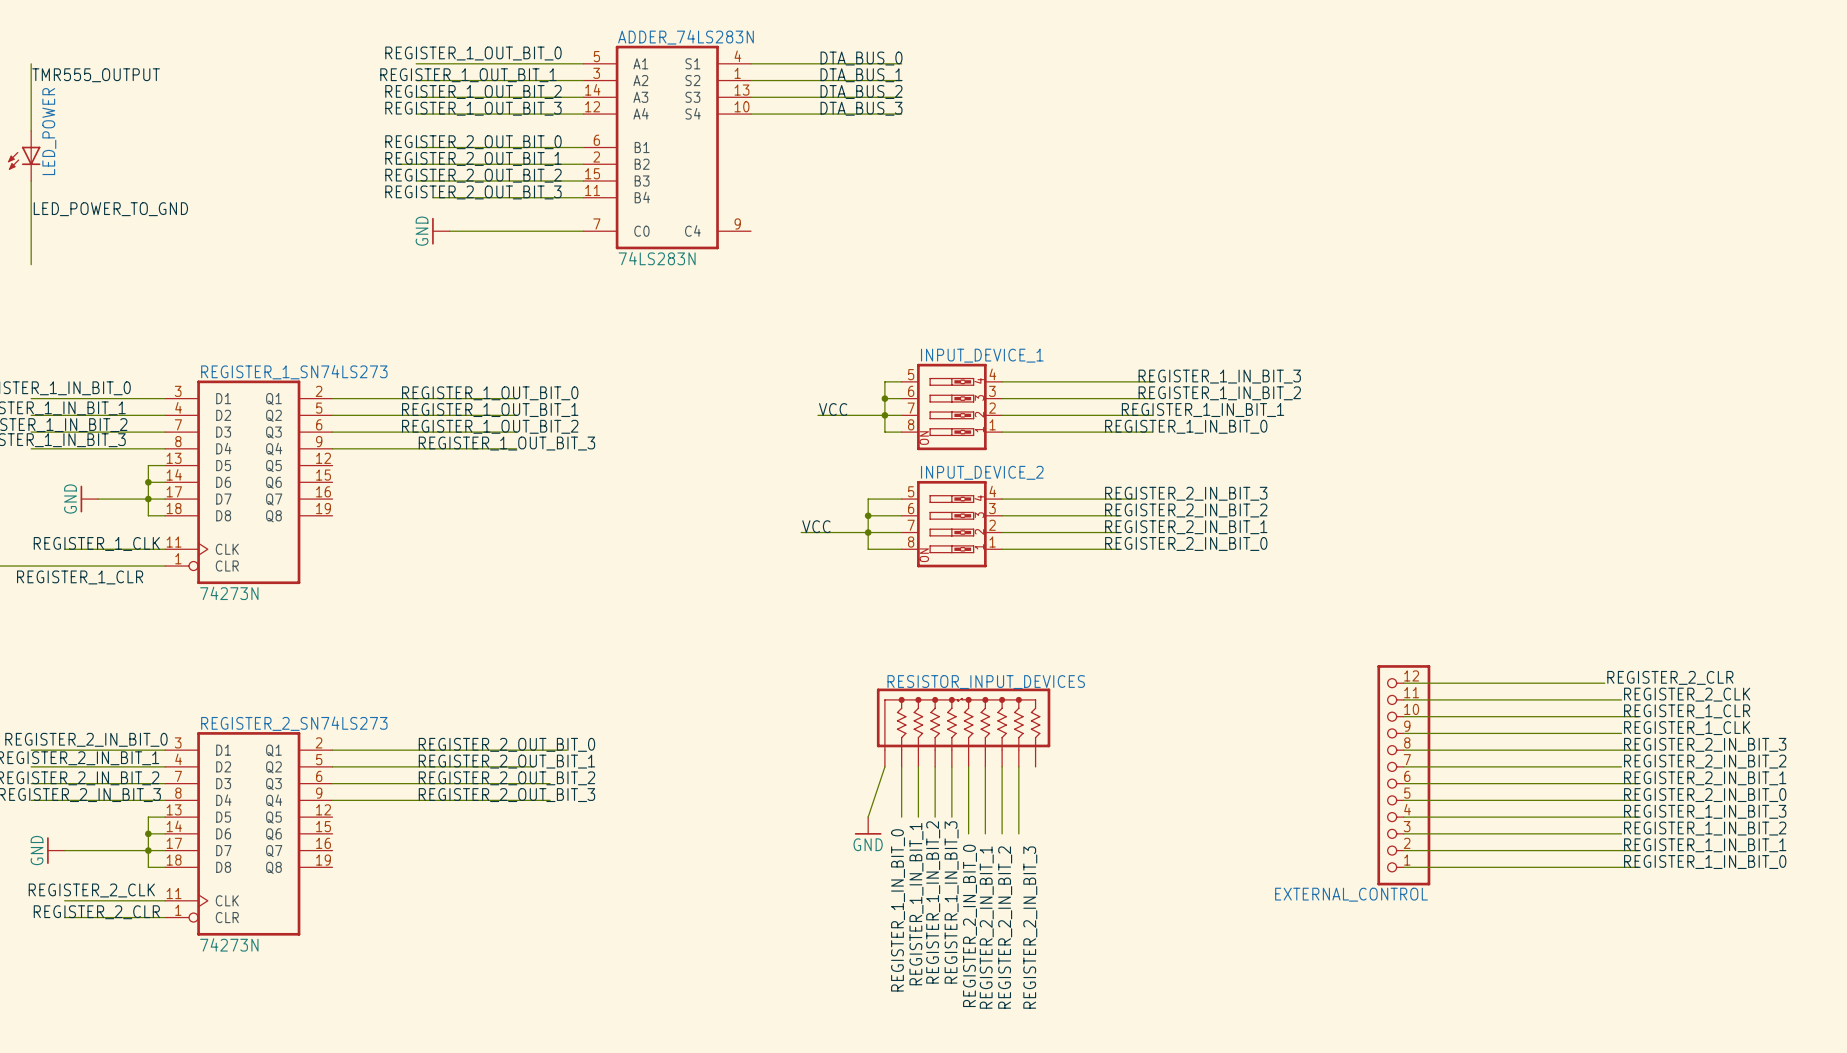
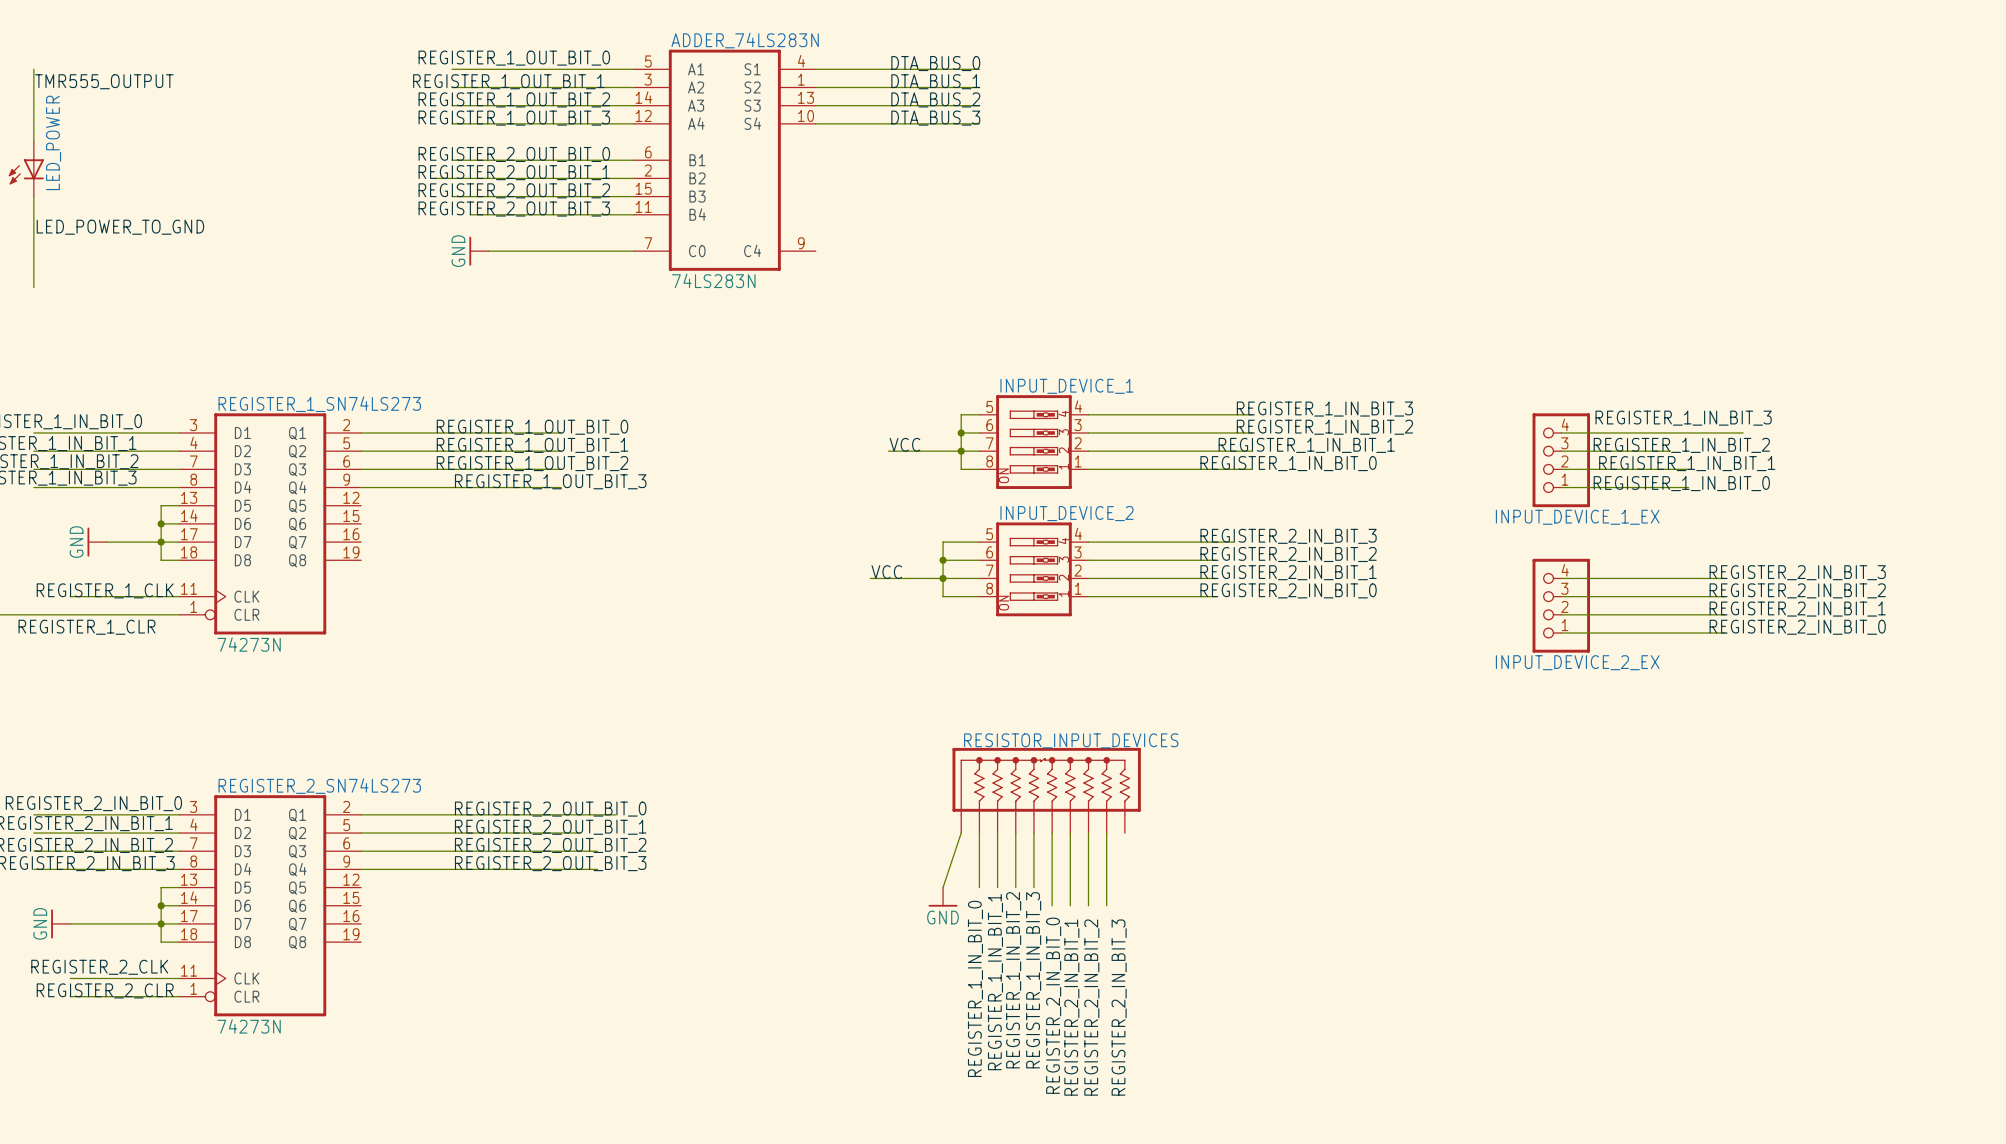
label: none -> REGISTER_1_IN_BIT_3 (1683, 418)
wire: none -> (1561, 432) (1743, 432)
label: none -> REGISTER_1_IN_BIT_2 (1681, 445)
wire: none -> (1561, 451) (1670, 451)
INPUT_DEVICE_1_EX: none -> (1561, 460)
label: none -> REGISTER_1_IN_BIT_1 (1687, 463)
wire: none -> (1561, 469) (1688, 469)
label: none -> REGISTER_1_IN_BIT_0 (1681, 483)
wire: none -> (1561, 487) (1688, 487)
label: none -> REGISTER_2_IN_BIT_3 (1797, 572)
wire: none -> (1561, 578) (1724, 578)
label: none -> REGISTER_2_IN_BIT_2 (1797, 590)
wire: none -> (1561, 596) (1724, 596)
INPUT_DEVICE_2_EX: none -> (1561, 605)
label: none -> REGISTER_2_IN_BIT_1 (1797, 609)
wire: none -> (1561, 614) (1724, 614)
label: none -> REGISTER_2_IN_BIT_0 (1797, 627)
wire: none -> (1561, 633) (1724, 633)
label: REGISTER_2_CLR (1670, 677) -> none
wire: (1403, 683) (1604, 683) -> none
label: REGISTER_2_CLK (1687, 694) -> none
wire: (1403, 699) (1621, 699) -> none
label: REGISTER_1_CLR (1687, 711) -> none
wire: (1403, 716) (1638, 716) -> none
label: REGISTER_1_CLK (1687, 728) -> none
wire: (1403, 733) (1621, 733) -> none
label: REGISTER_2_IN_BIT_3 (1705, 744) -> none
wire: (1403, 750) (1638, 750) -> none
label: REGISTER_2_IN_BIT_2 (1705, 761) -> none
wire: (1403, 766) (1621, 766) -> none
EXTERNAL_CONTROL: (1403, 775) -> none
label: REGISTER_2_IN_BIT_1 (1705, 778) -> none
wire: (1403, 783) (1638, 783) -> none
label: REGISTER_2_IN_BIT_0 (1705, 795) -> none
wire: (1403, 800) (1638, 800) -> none
label: REGISTER_1_IN_BIT_3 (1705, 811) -> none
wire: (1403, 817) (1638, 817) -> none
label: REGISTER_1_IN_BIT_2 (1705, 828) -> none
wire: (1403, 833) (1621, 833) -> none
label: REGISTER_1_IN_BIT_1 (1705, 845) -> none
wire: (1403, 850) (1638, 850) -> none
label: REGISTER_1_IN_BIT_0 (1705, 862) -> none
wire: (1403, 867) (1638, 867) -> none

